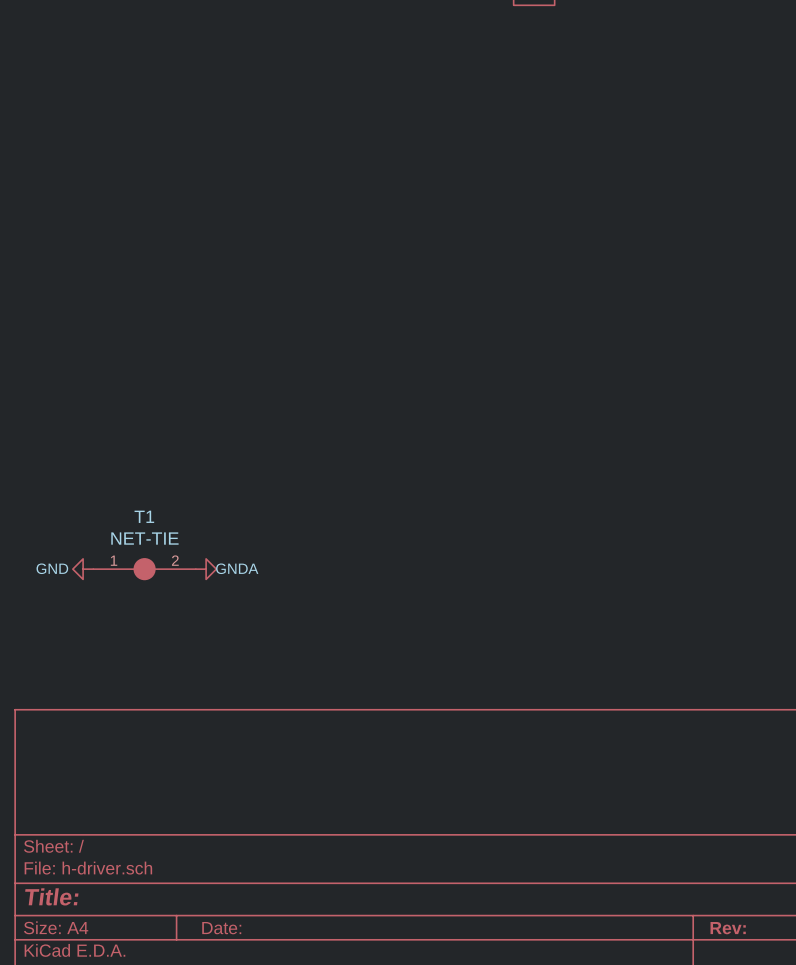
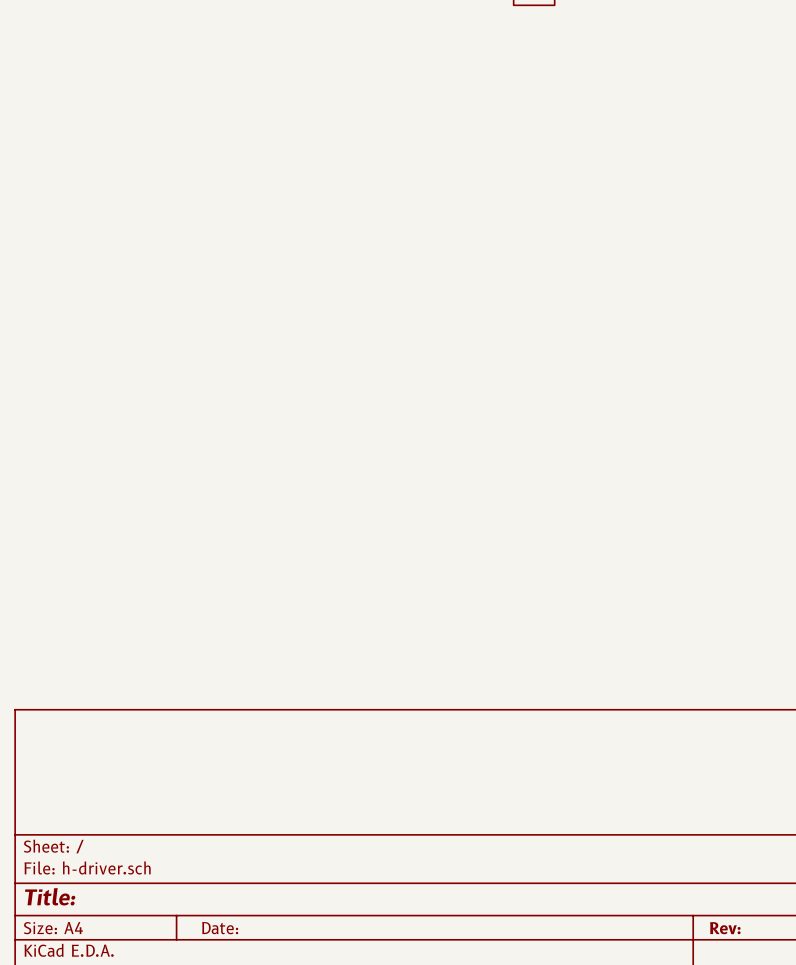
power symbol: GND (83, 569) -> none
T1: NET-TIE (144, 569) -> none
power symbol: GNDA (206, 569) -> none

